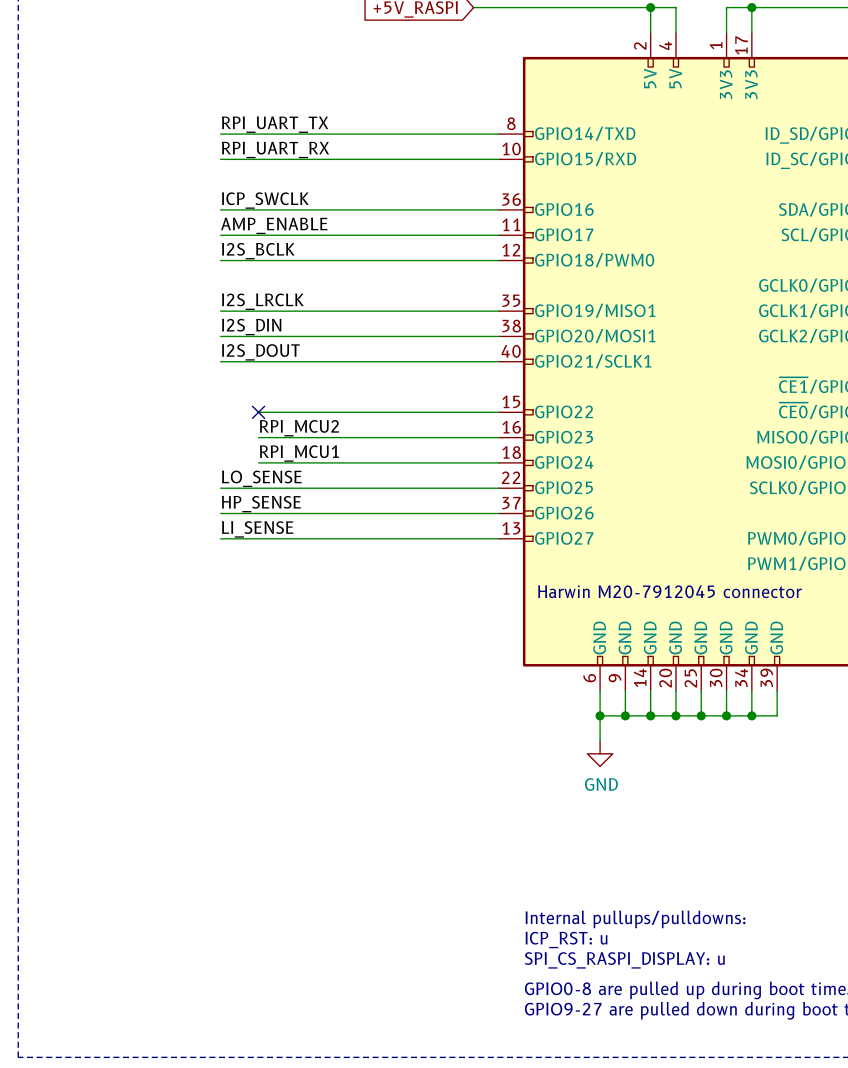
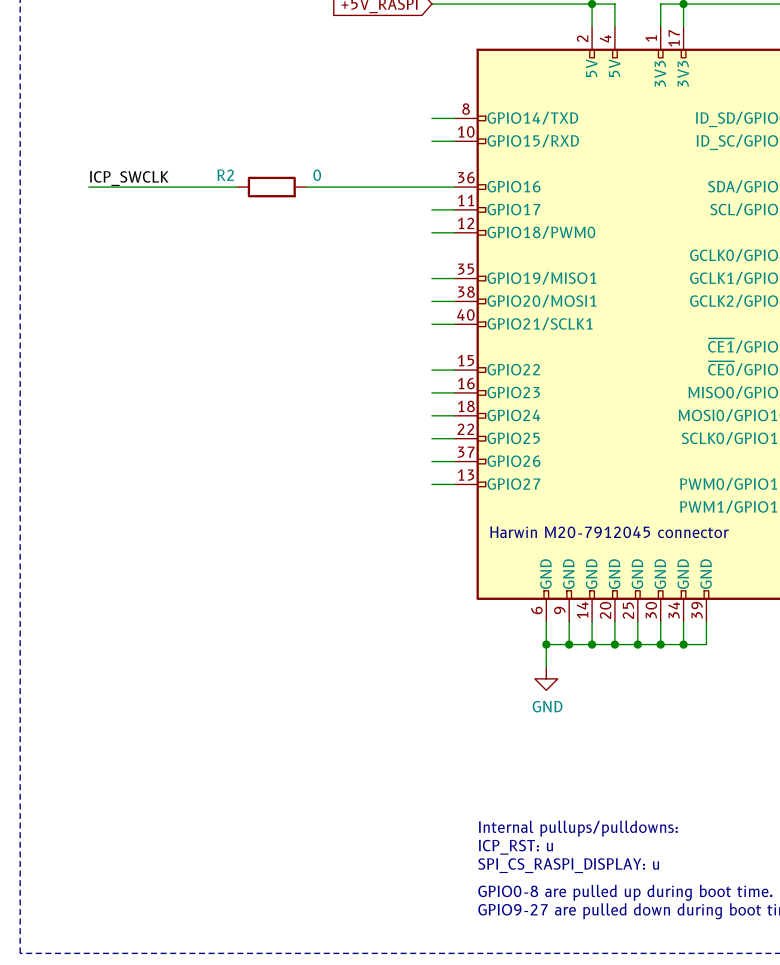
label: RPI_UART_TX (275, 124) -> none
wire: (220, 134) (473, 134) -> none
label: RPI_UART_RX (275, 149) -> none
wire: (220, 159) (473, 159) -> none
label position: ICP_SWCLK (265, 200) -> ICP_SWCLK (129, 178)
wire: none -> (88, 187) (203, 187)
wire: (258, 209) (334, 209) -> none
R2: none -> 0 (271, 187)
label: AMP_ENABLE (274, 225) -> none
wire: (220, 235) (473, 235) -> none
label: I2S_BCLK (258, 251) -> none
wire: (220, 260) (473, 260) -> none
label: I2S_LRCLK (262, 301) -> none
wire: (220, 311) (473, 311) -> none
label: I2S_DIN (251, 327) -> none
wire: (220, 336) (473, 336) -> none
label: I2S_DOUT (260, 352) -> none
wire: (220, 361) (473, 361) -> none
wire: (258, 412) (473, 412) -> none
no-connect mark: (258, 412) -> none
label: RPI_MCU2 (299, 428) -> none
wire: (258, 437) (473, 437) -> none
label: RPI_MCU1 (299, 453) -> none
wire: (258, 462) (473, 462) -> none
label: LO_SENSE (261, 478) -> none
wire: (220, 488) (473, 488) -> none
label: HP_SENSE (261, 504) -> none
wire: (220, 513) (473, 513) -> none
label: LI_SENSE (257, 529) -> none
wire: (220, 538) (473, 538) -> none

